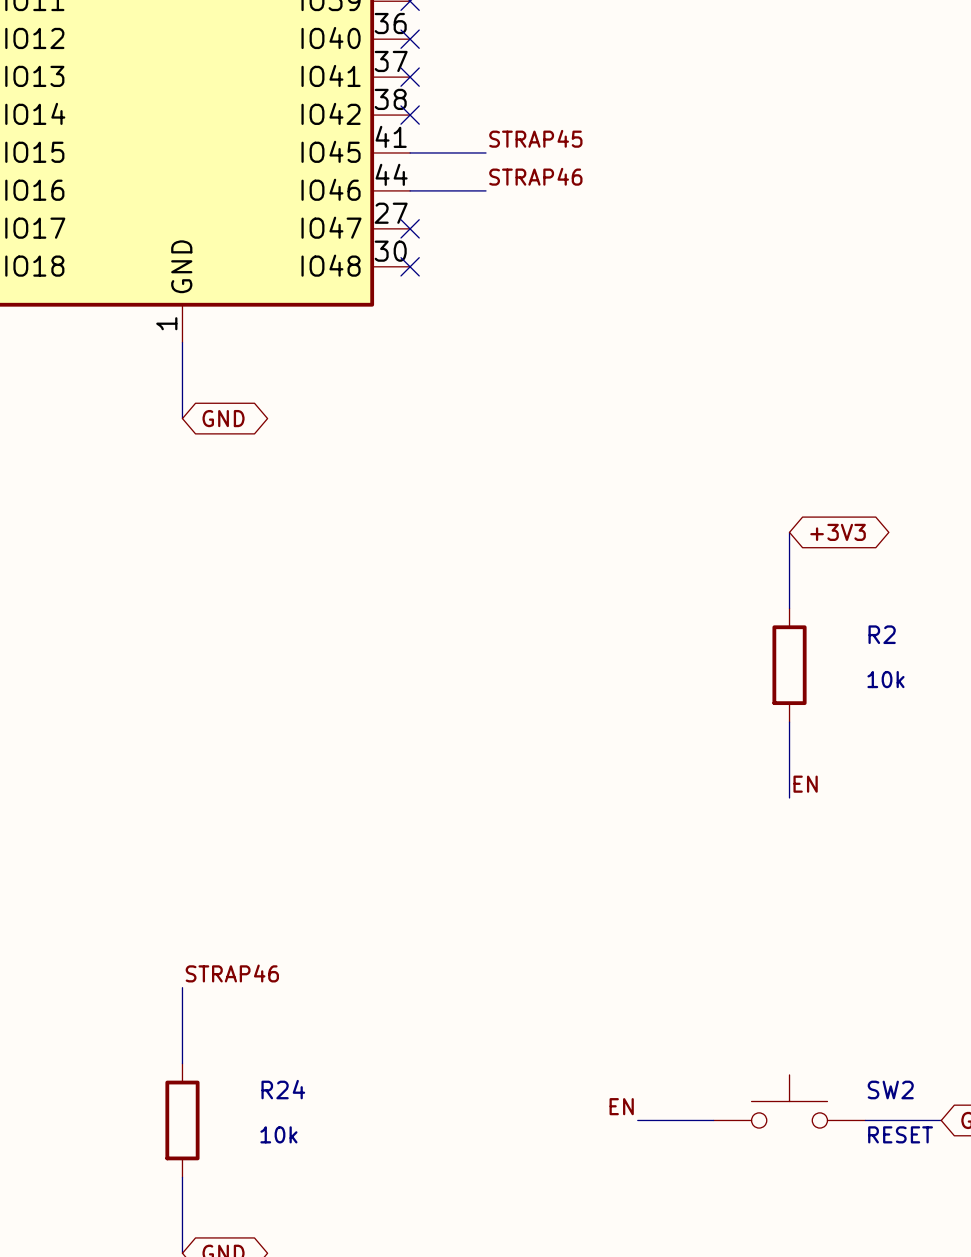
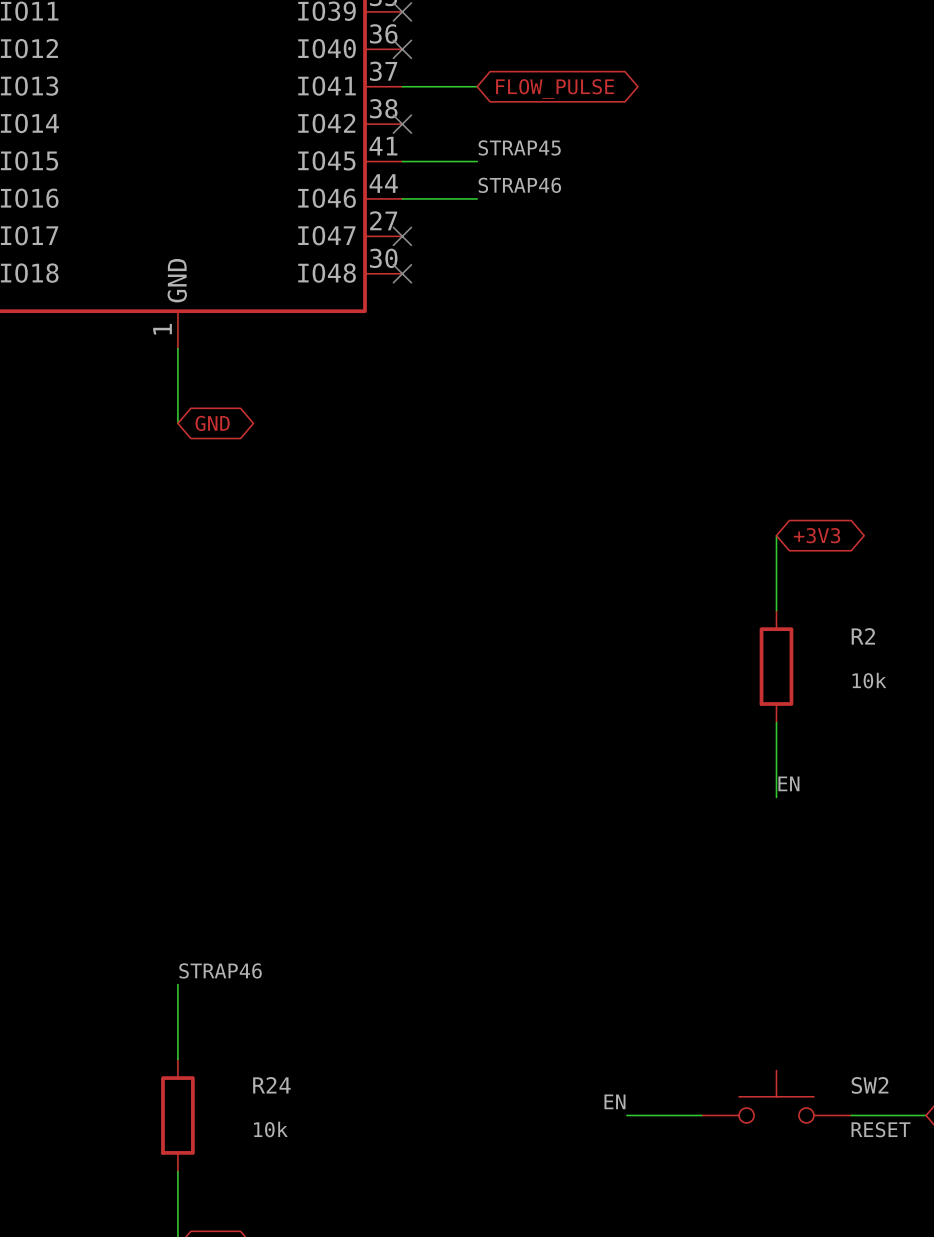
wire: none -> (402, 86) (477, 86)
no-connect mark: (410, 77) -> none
global label: none -> FLOW_PULSE (555, 88)

